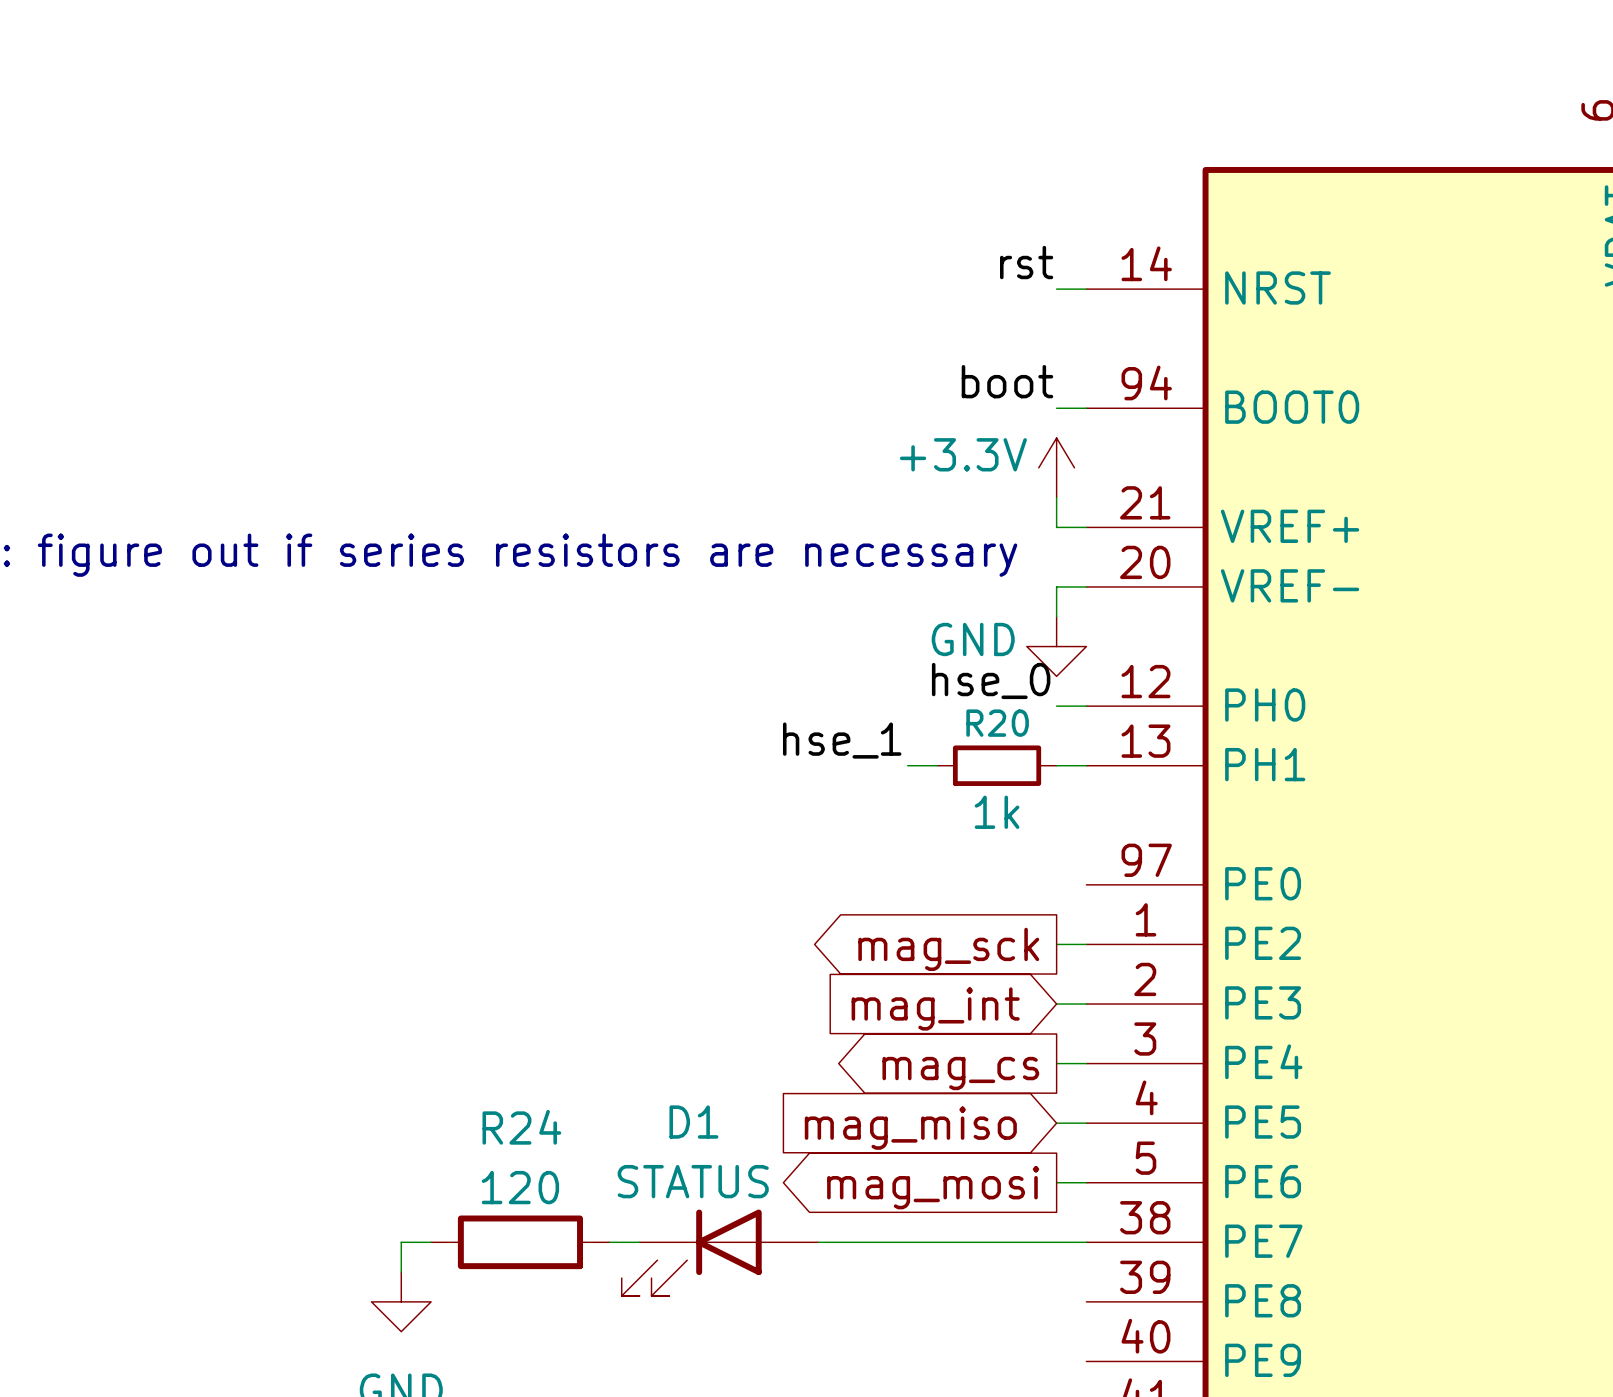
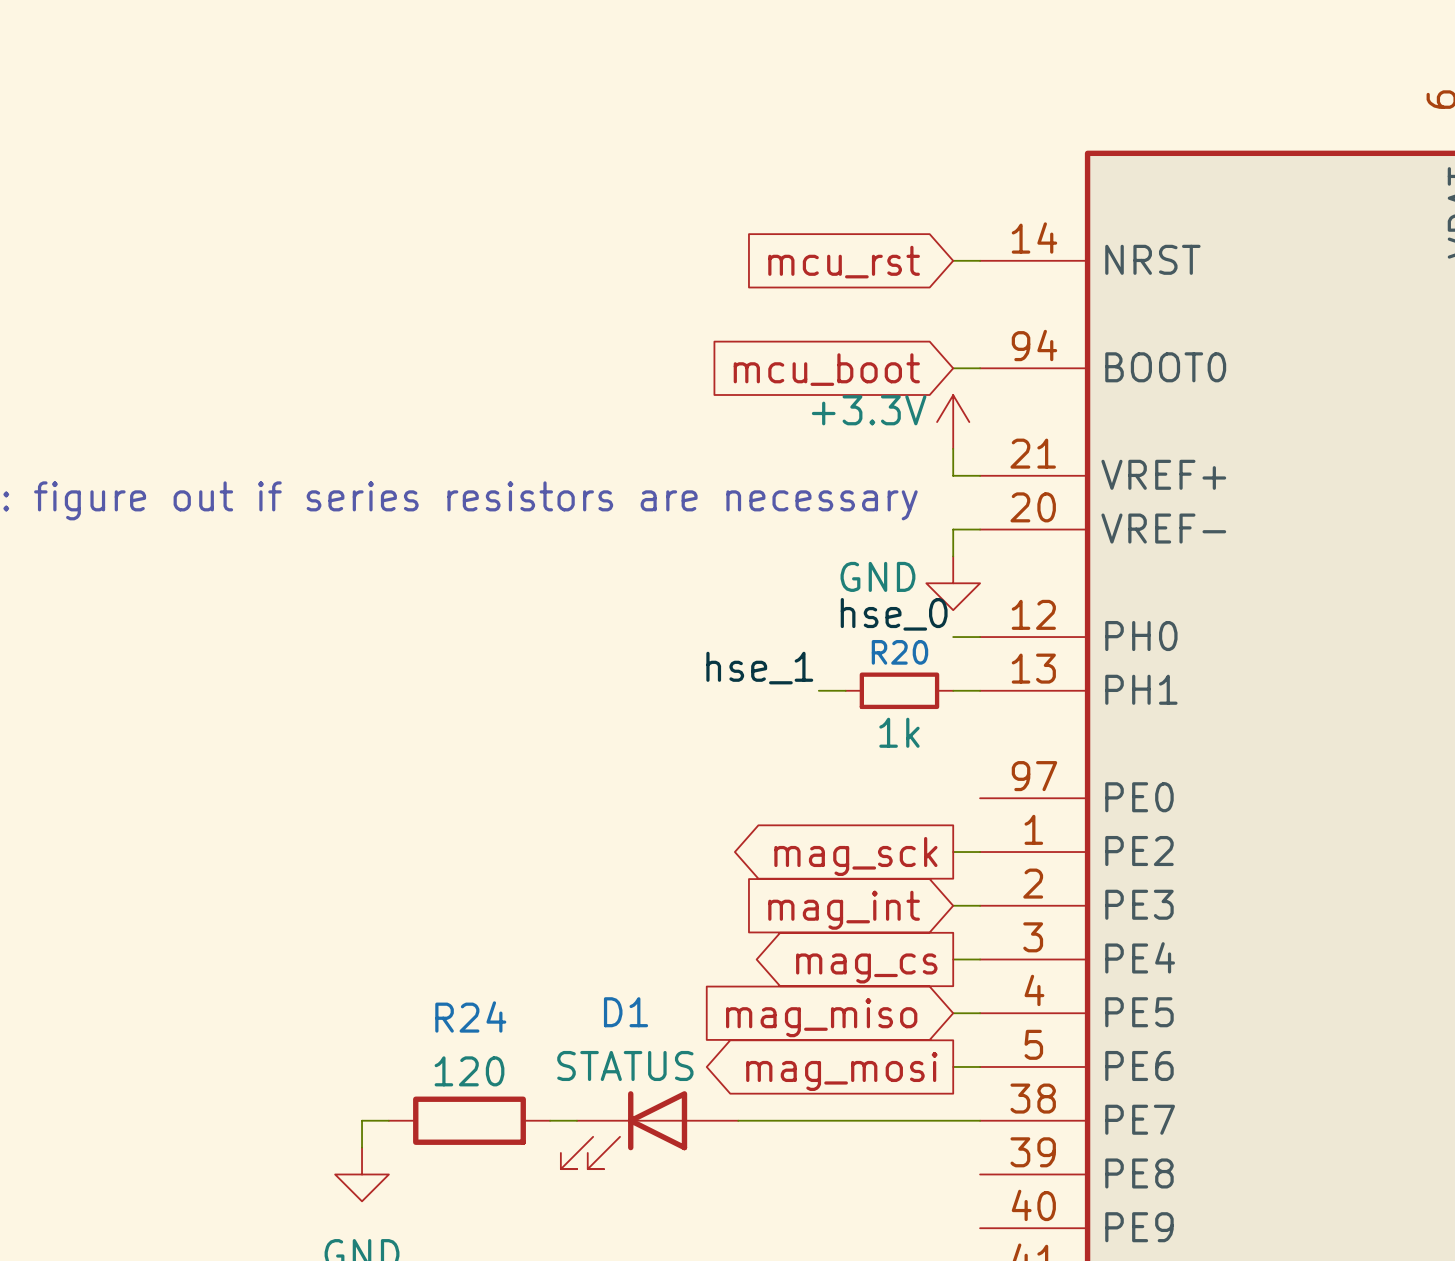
label: rst (1026, 262) -> none
global label: none -> mcu_rst (844, 262)
label: boot (1007, 381) -> none
global label: none -> mcu_boot (826, 369)

